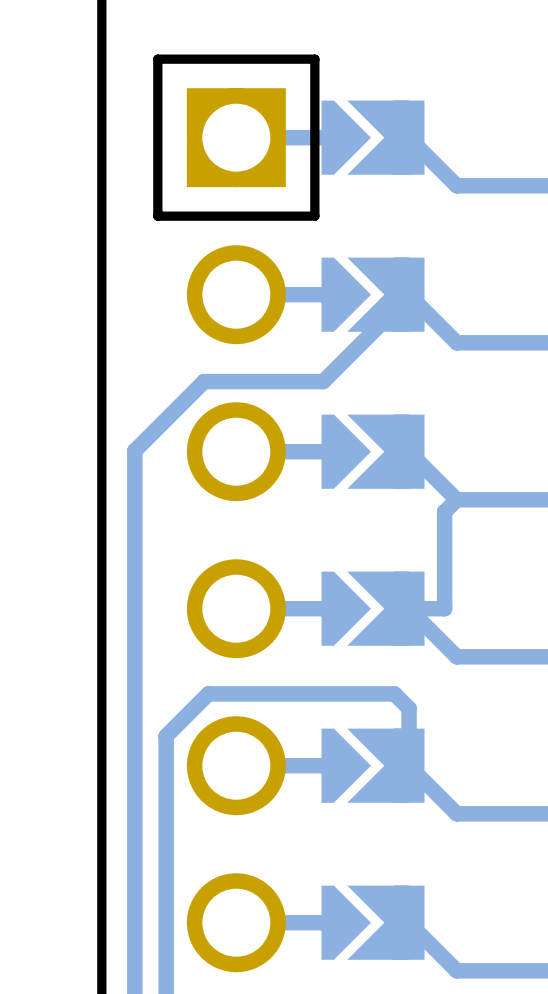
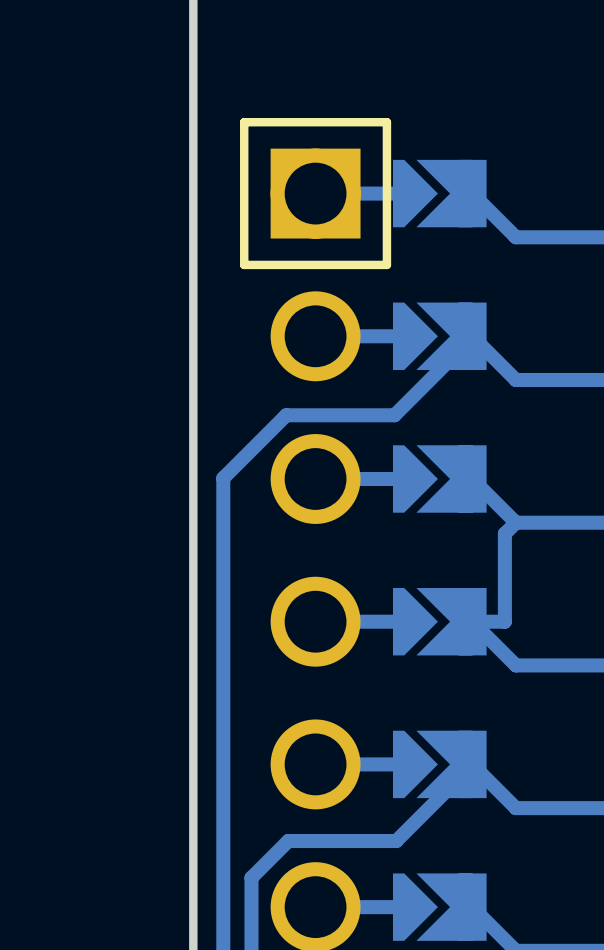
track: (409, 765) (409, 708) (394, 693) (208, 693) (166, 736) (165, 890) -> (472, 764) (396, 841) (288, 841) (251, 877)

